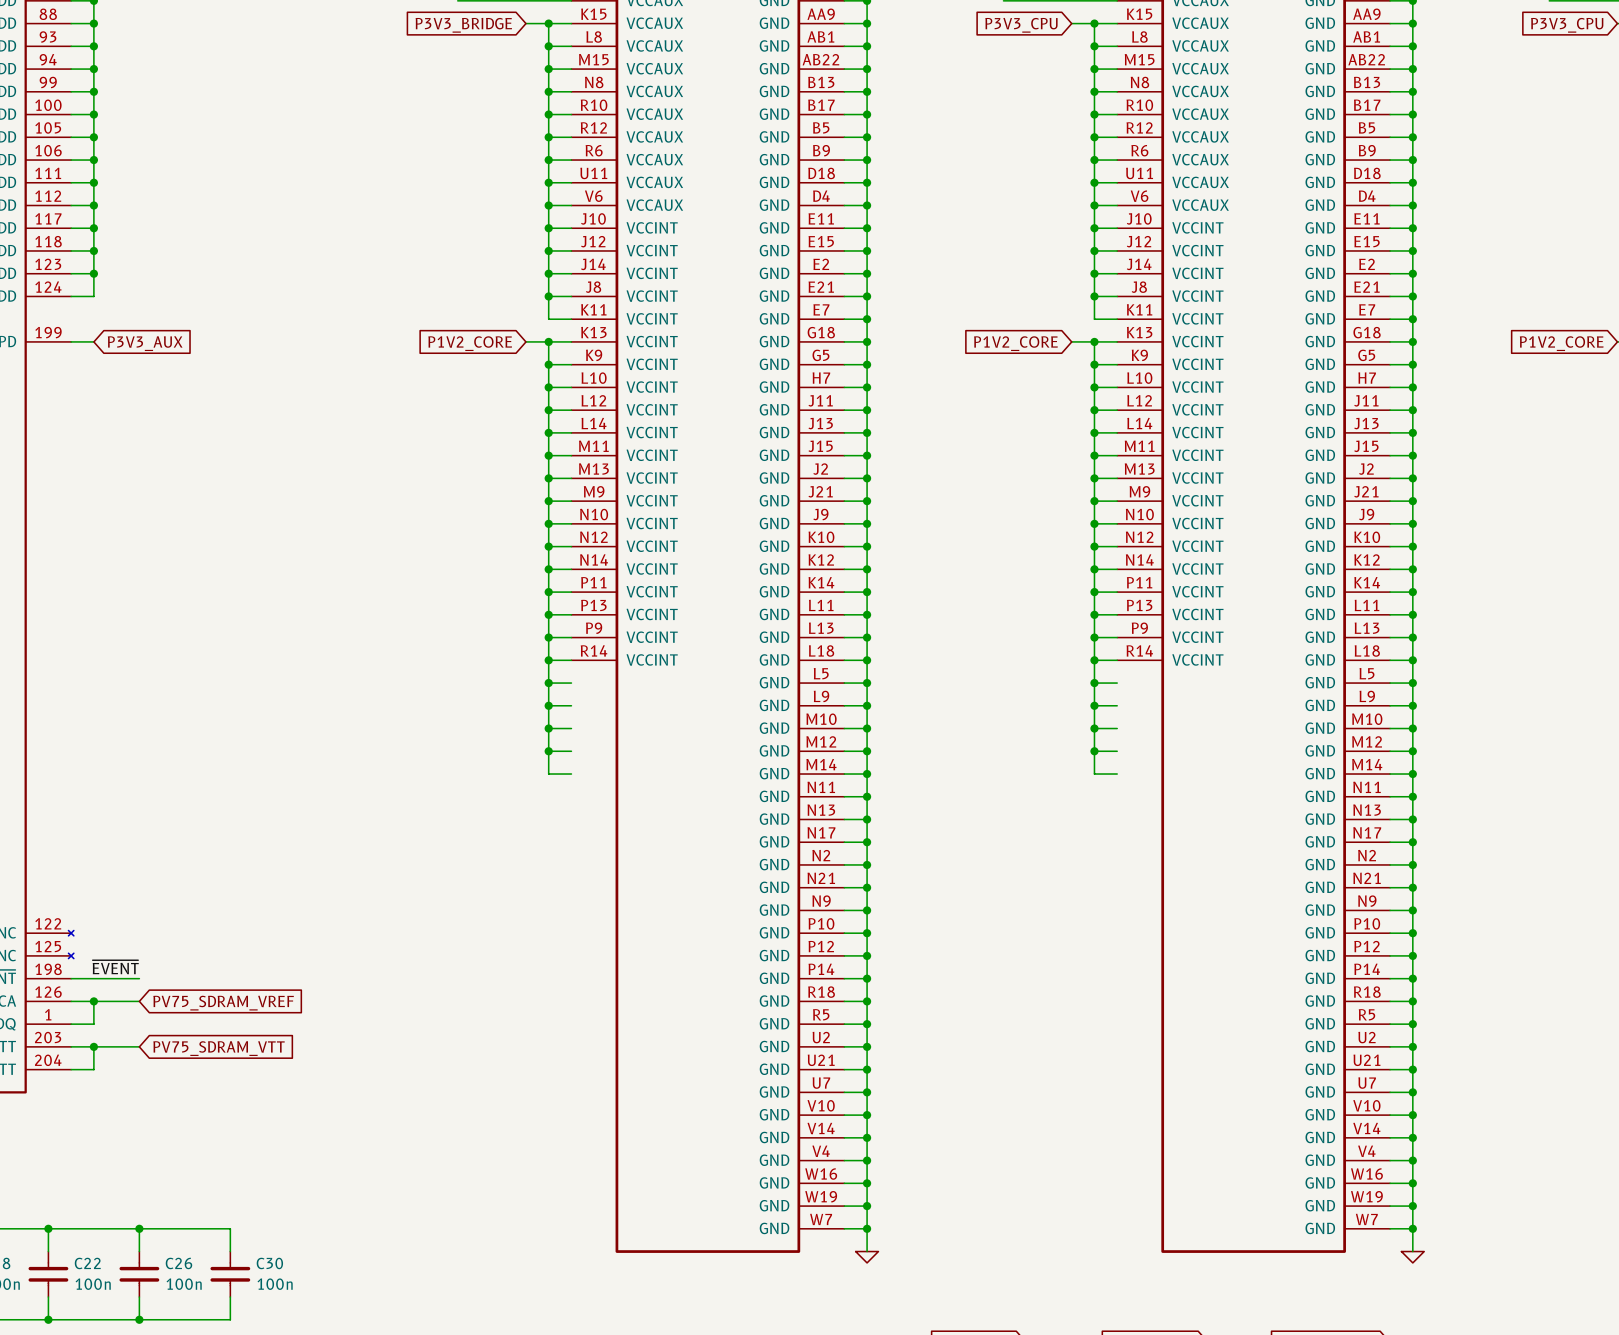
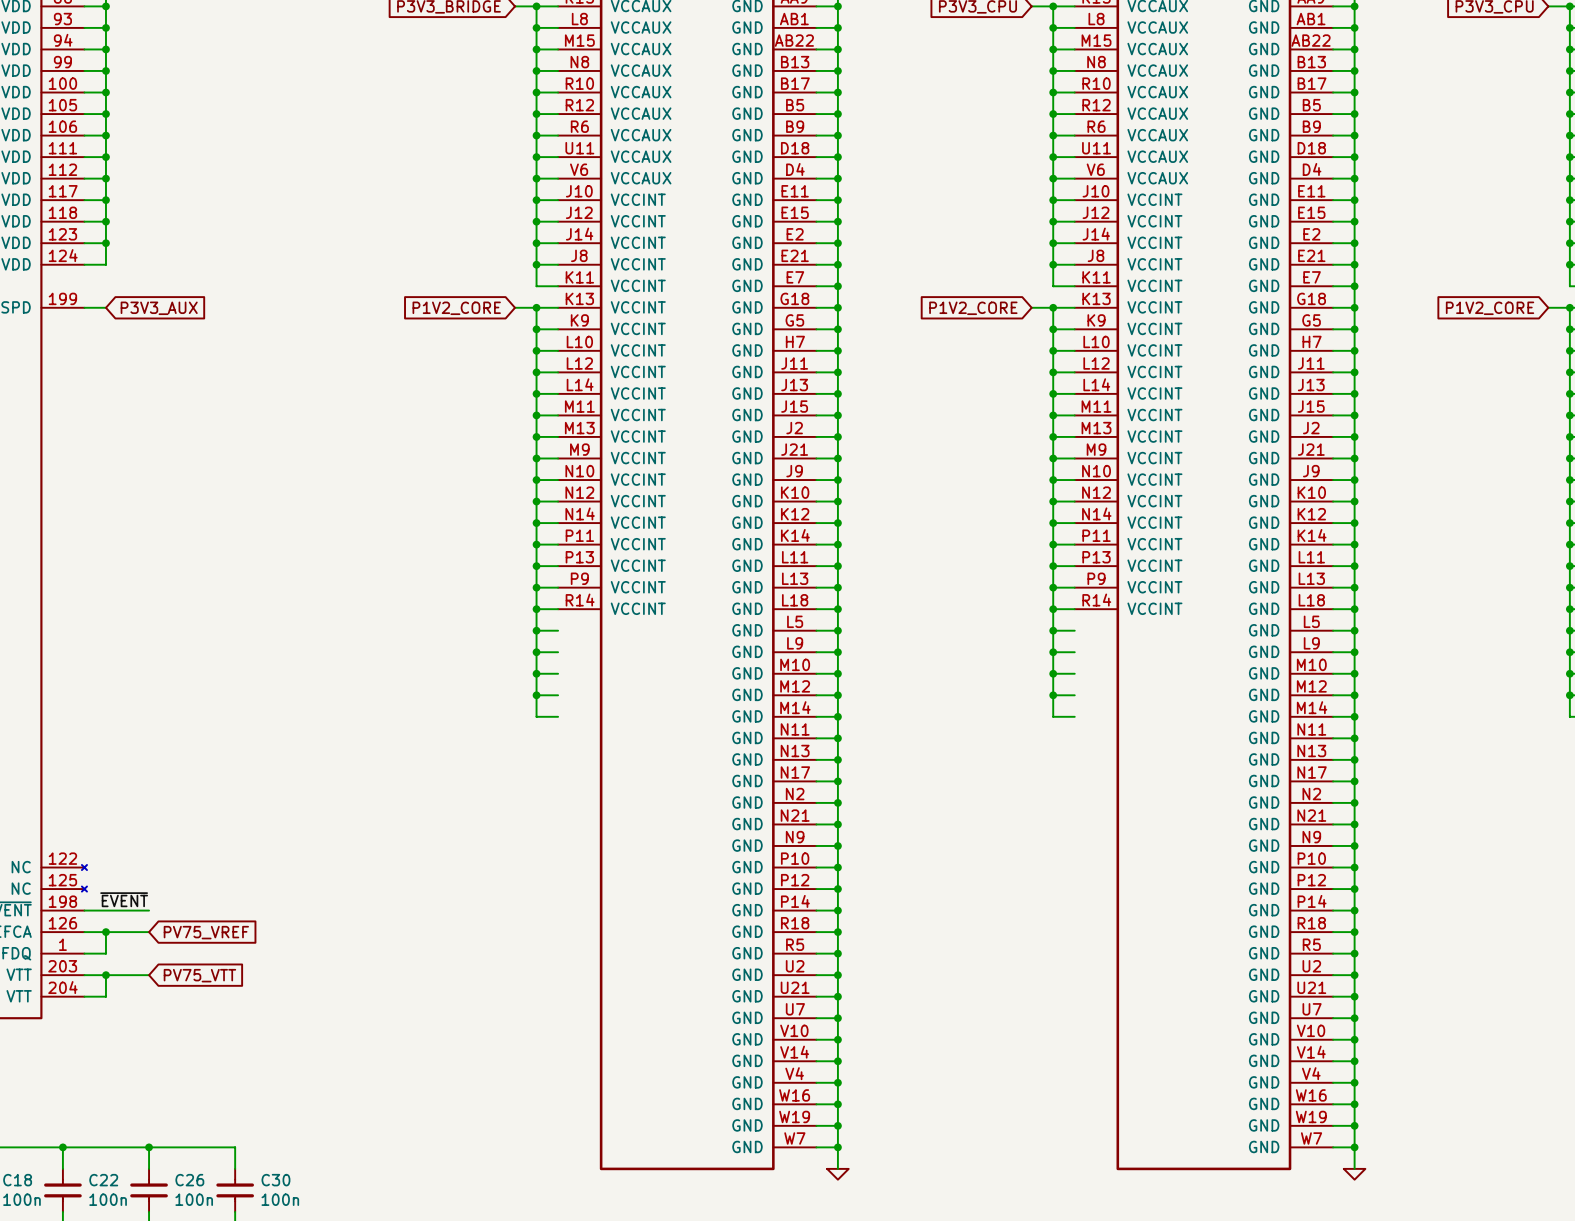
global label: PV75_SDRAM_VREF (223, 1003) -> PV75_VREF (206, 932)
global label: PV75_SDRAM_VTT (219, 1048) -> PV75_VTT (199, 975)

